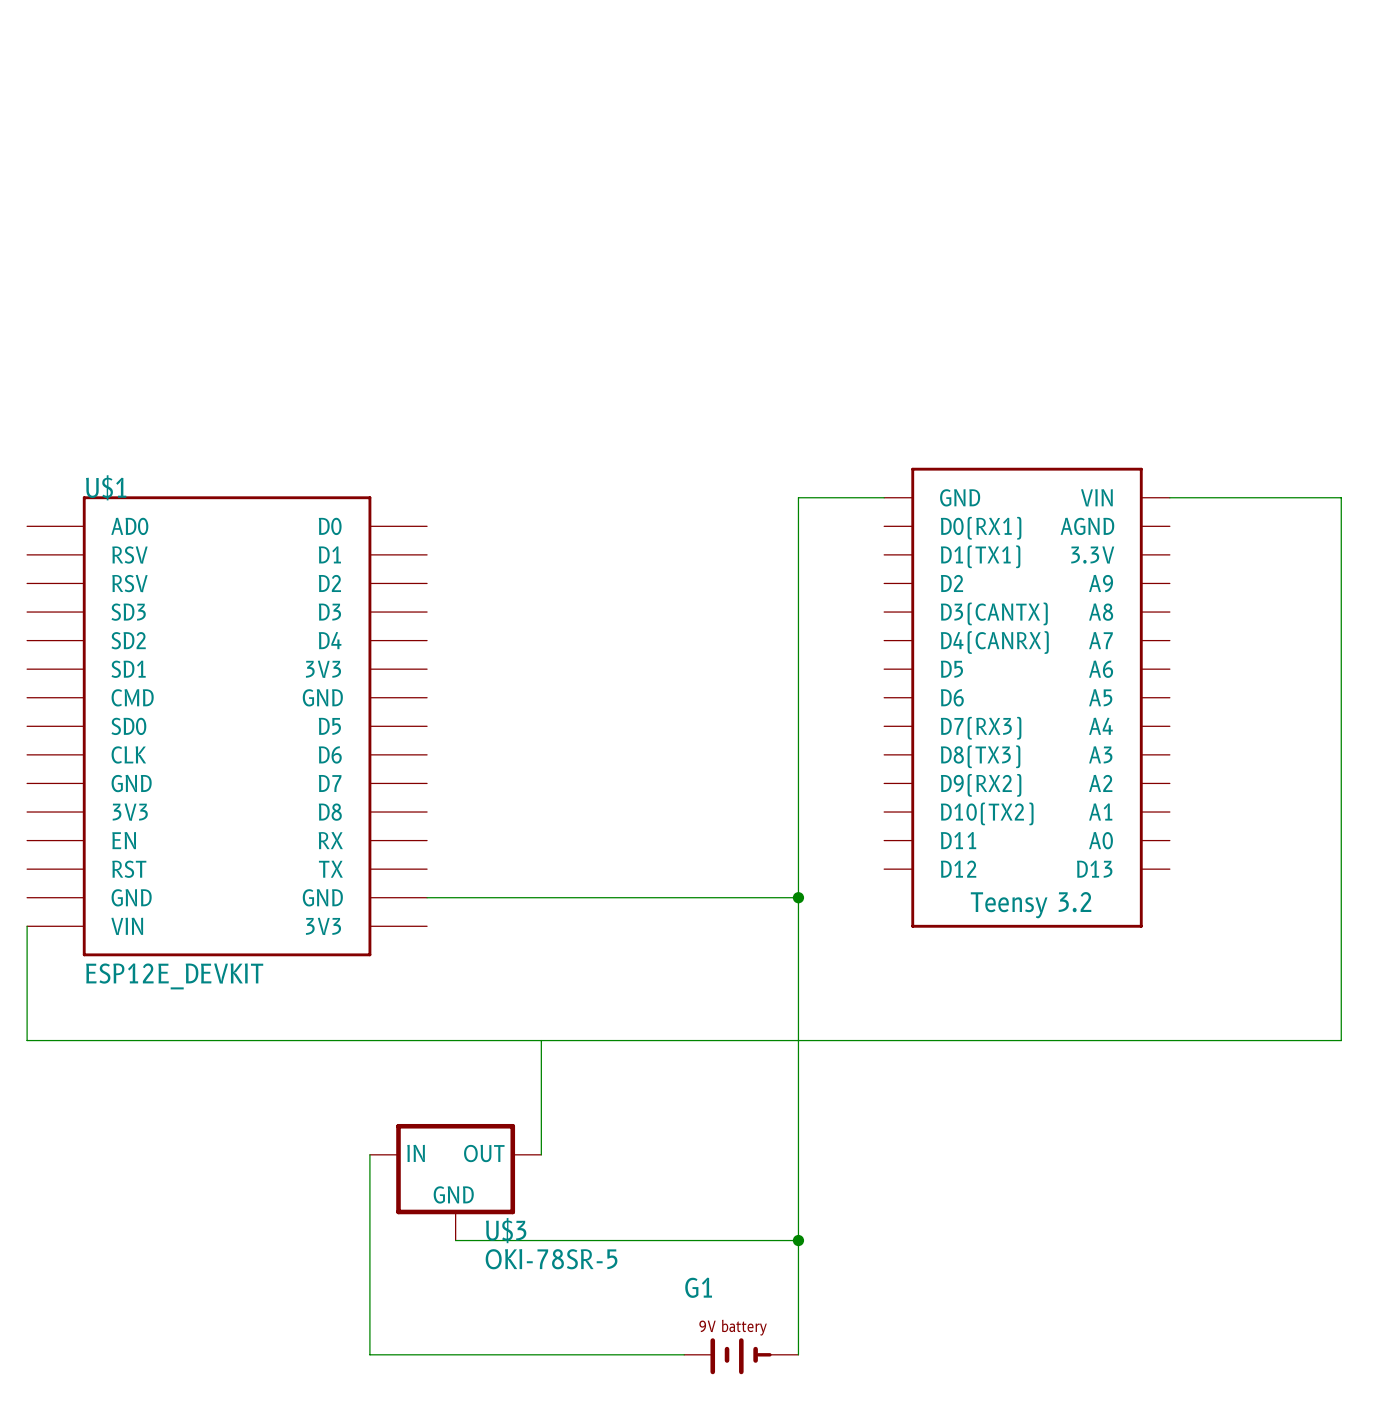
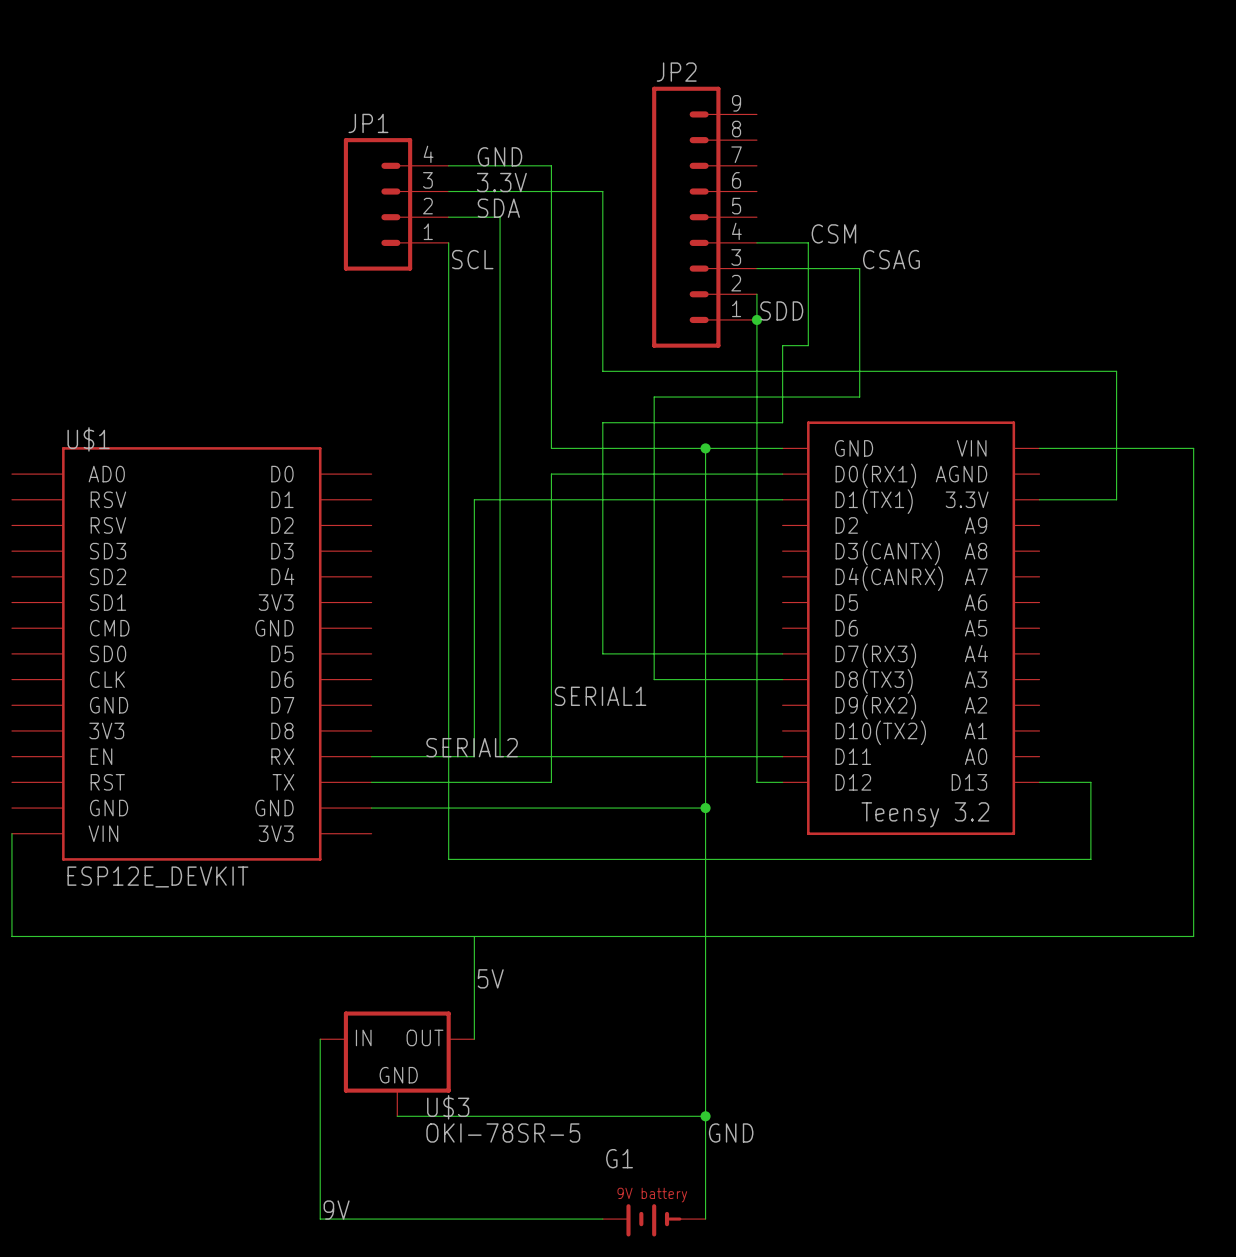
label: none -> GND (499, 156)
wire: none -> (448, 165) (551, 165) (551, 448) (705, 448)
label: none -> 3.3V (501, 182)
wire: none -> (448, 191) (602, 191) (602, 371) (1116, 371) (1116, 499) (1039, 499)
JP1: none -> (396, 204)
label: none -> SDA (498, 208)
wire: none -> (448, 217) (500, 217) (500, 756) (782, 756)
JP2: none -> (704, 217)
label: none -> CSM (833, 233)
wire: none -> (448, 242) (448, 859) (1090, 859) (1090, 782) (1039, 782)
wire: none -> (756, 242) (808, 242) (808, 345) (782, 345) (782, 422) (602, 422) (602, 653) (782, 653)
label: none -> SCL (472, 259)
label: none -> CSAG (891, 259)
wire: none -> (756, 268) (859, 268) (859, 397) (654, 397) (654, 679) (782, 679)
wire: none -> (756, 294) (756, 782) (782, 782)
label: none -> SDD (781, 310)
junction: none -> (756, 319)
junction: none -> (705, 448)
wire: none -> (782, 474) (551, 474) (551, 782) (371, 782)
wire: none -> (782, 499) (474, 499) (474, 756) (371, 756)
label: none -> SERIAL1 (600, 696)
label: none -> SERIAL2 (472, 747)
label: none -> 5V (490, 978)
label: none -> GND (731, 1133)
label: none -> 9V (336, 1210)

